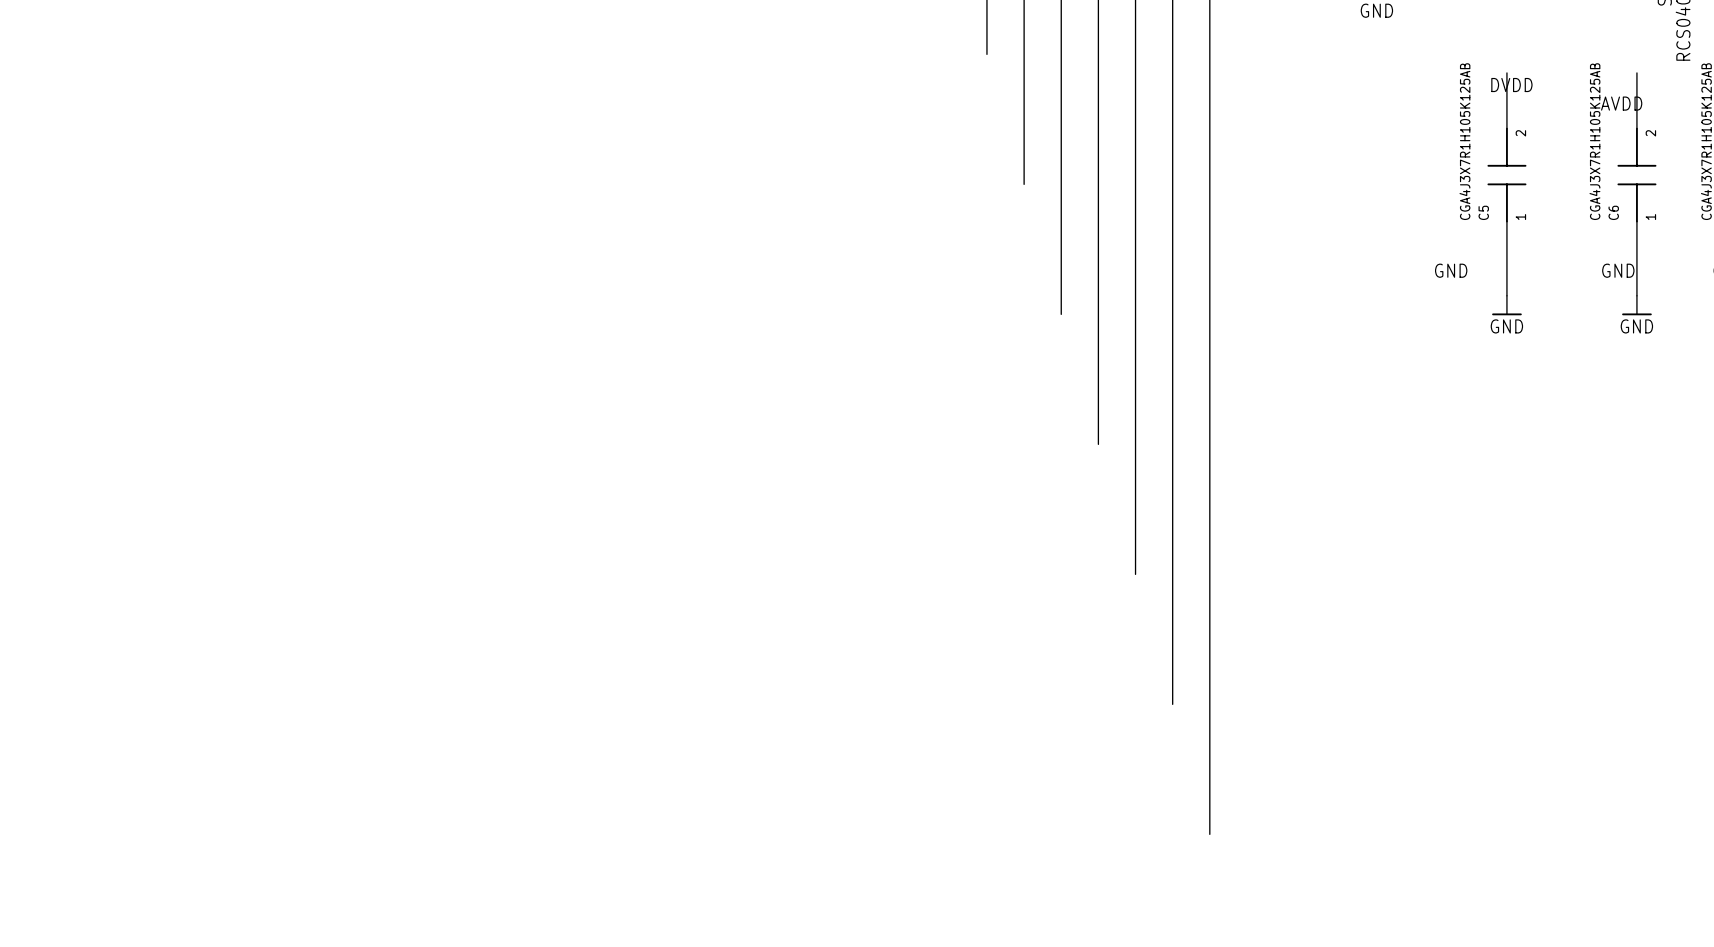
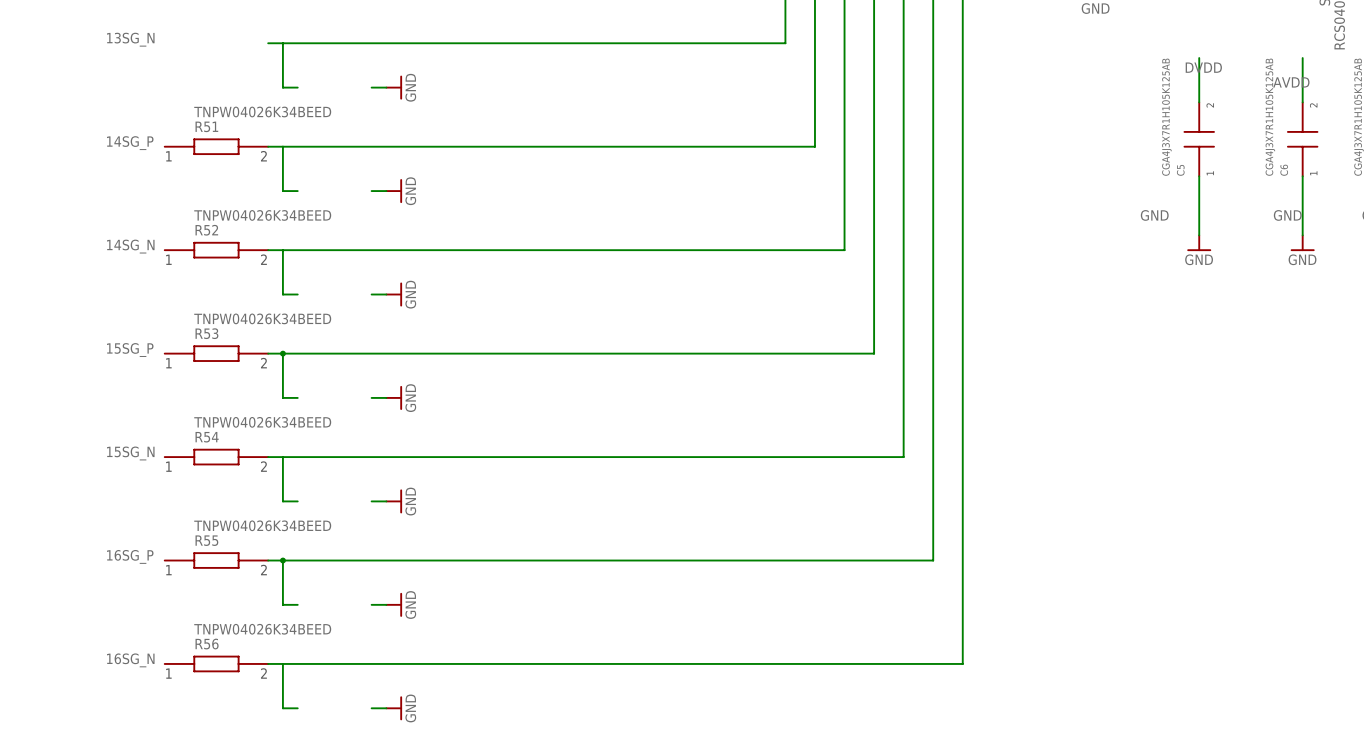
label: none -> 13SG_N (130, 39)
wire: none -> (268, 43) (785, 43)
wire: none -> (282, 43) (282, 87) (297, 87)
wire: none -> (371, 87) (386, 87)
power symbol: none -> GND (394, 87)
label: none -> 14SG_P (130, 143)
R51: none -> TNPW04026K34BEED (216, 146)
wire: none -> (268, 146) (814, 146)
wire: none -> (282, 146) (282, 191) (297, 191)
wire: none -> (371, 191) (386, 191)
power symbol: none -> GND (394, 191)
label: none -> 14SG_N (130, 246)
R52: none -> TNPW04026K34BEED (216, 250)
wire: none -> (268, 250) (844, 250)
wire: none -> (282, 250) (282, 294) (297, 294)
wire: none -> (371, 294) (386, 294)
power symbol: none -> GND (394, 294)
label: none -> 15SG_P (130, 350)
R53: none -> TNPW04026K34BEED (216, 353)
wire: none -> (268, 353) (874, 353)
wire: none -> (282, 353) (282, 397) (297, 397)
junction: none -> (282, 353)
wire: none -> (371, 397) (386, 397)
power symbol: none -> GND (394, 397)
label: none -> 15SG_N (130, 453)
R54: none -> TNPW04026K34BEED (216, 457)
wire: none -> (268, 457) (903, 457)
wire: none -> (282, 457) (282, 501) (297, 501)
wire: none -> (371, 501) (386, 501)
power symbol: none -> GND (394, 501)
label: none -> 16SG_P (130, 556)
R55: none -> TNPW04026K34BEED (216, 560)
wire: none -> (268, 560) (933, 560)
wire: none -> (282, 560) (282, 604) (297, 604)
junction: none -> (282, 560)
wire: none -> (371, 604) (386, 604)
power symbol: none -> GND (394, 604)
label: none -> 16SG_N (130, 660)
R56: none -> TNPW04026K34BEED (216, 663)
wire: none -> (268, 663) (962, 663)
wire: none -> (282, 663) (282, 708) (297, 708)
wire: none -> (371, 708) (386, 708)
power symbol: none -> GND (394, 708)

